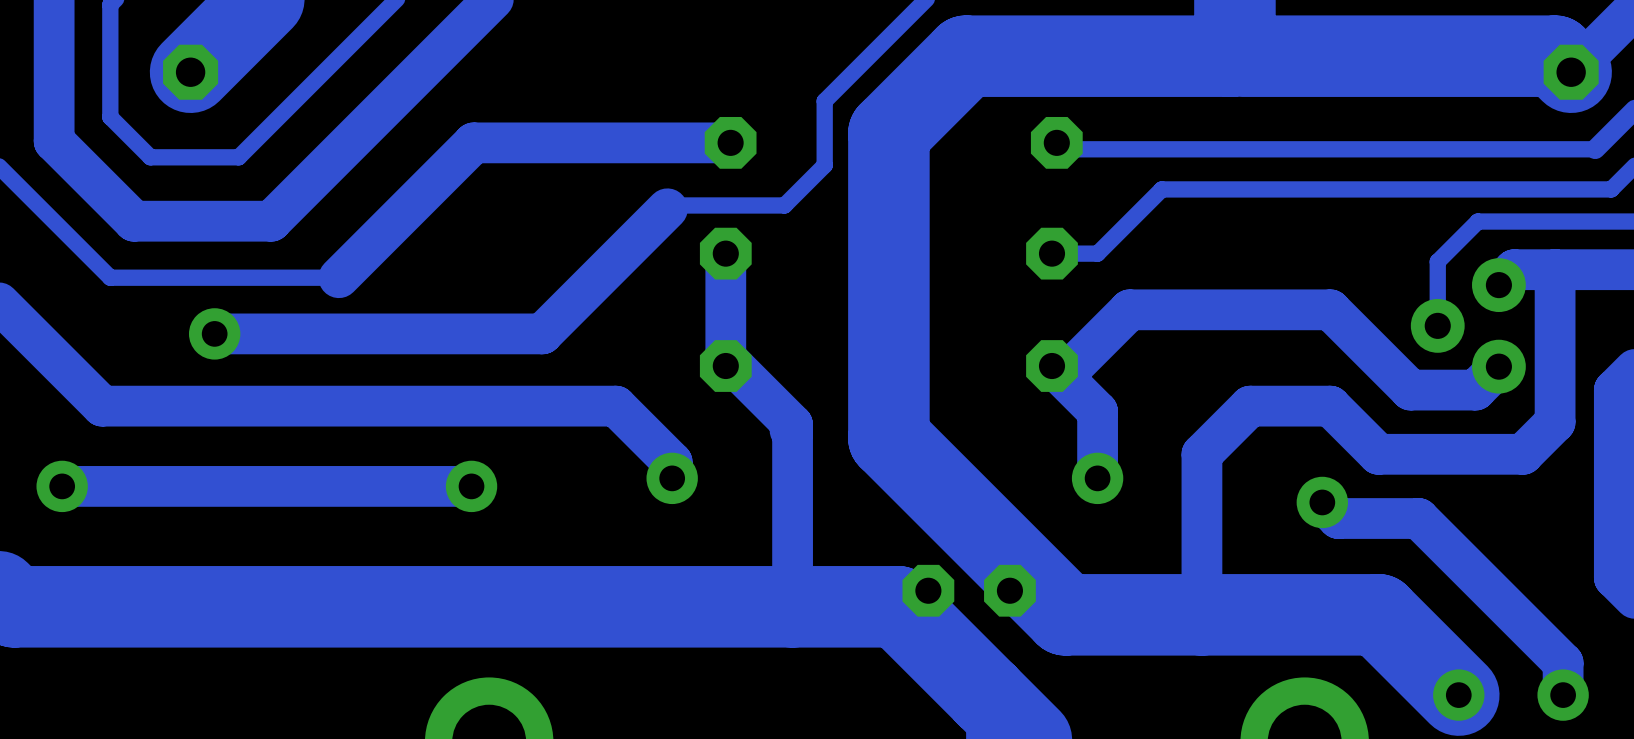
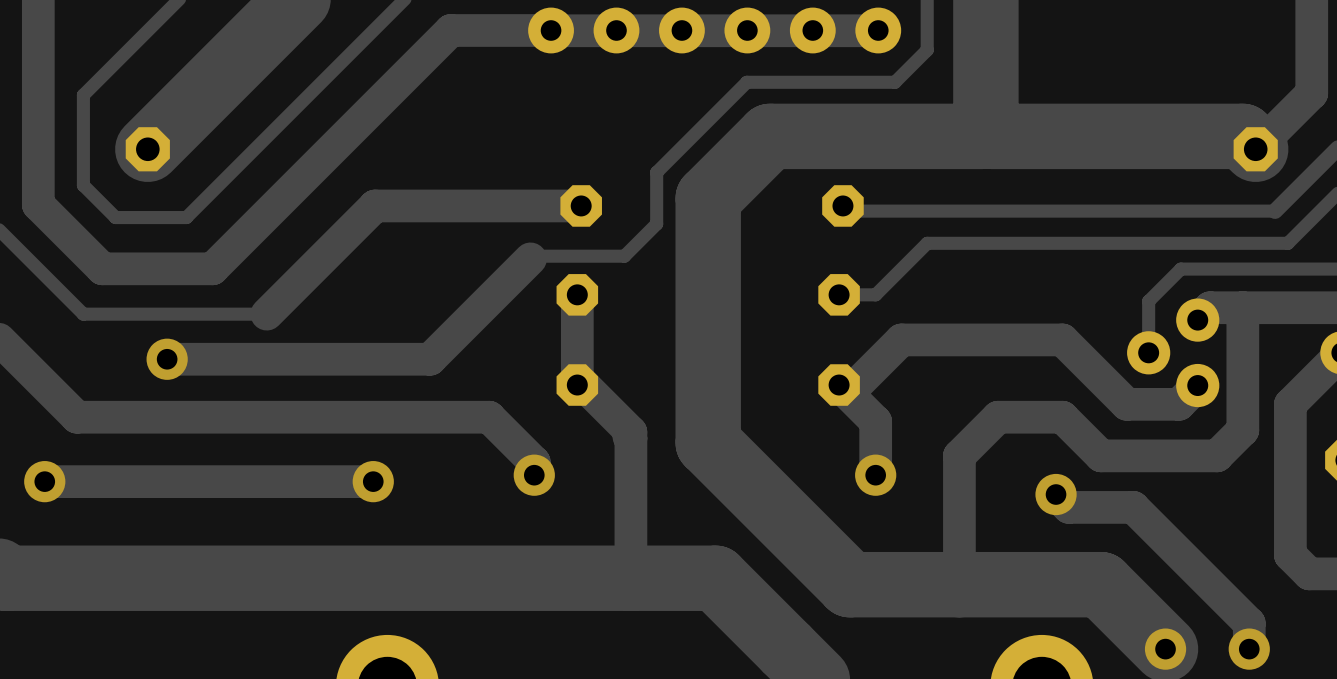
part: (969, 590) -> none

